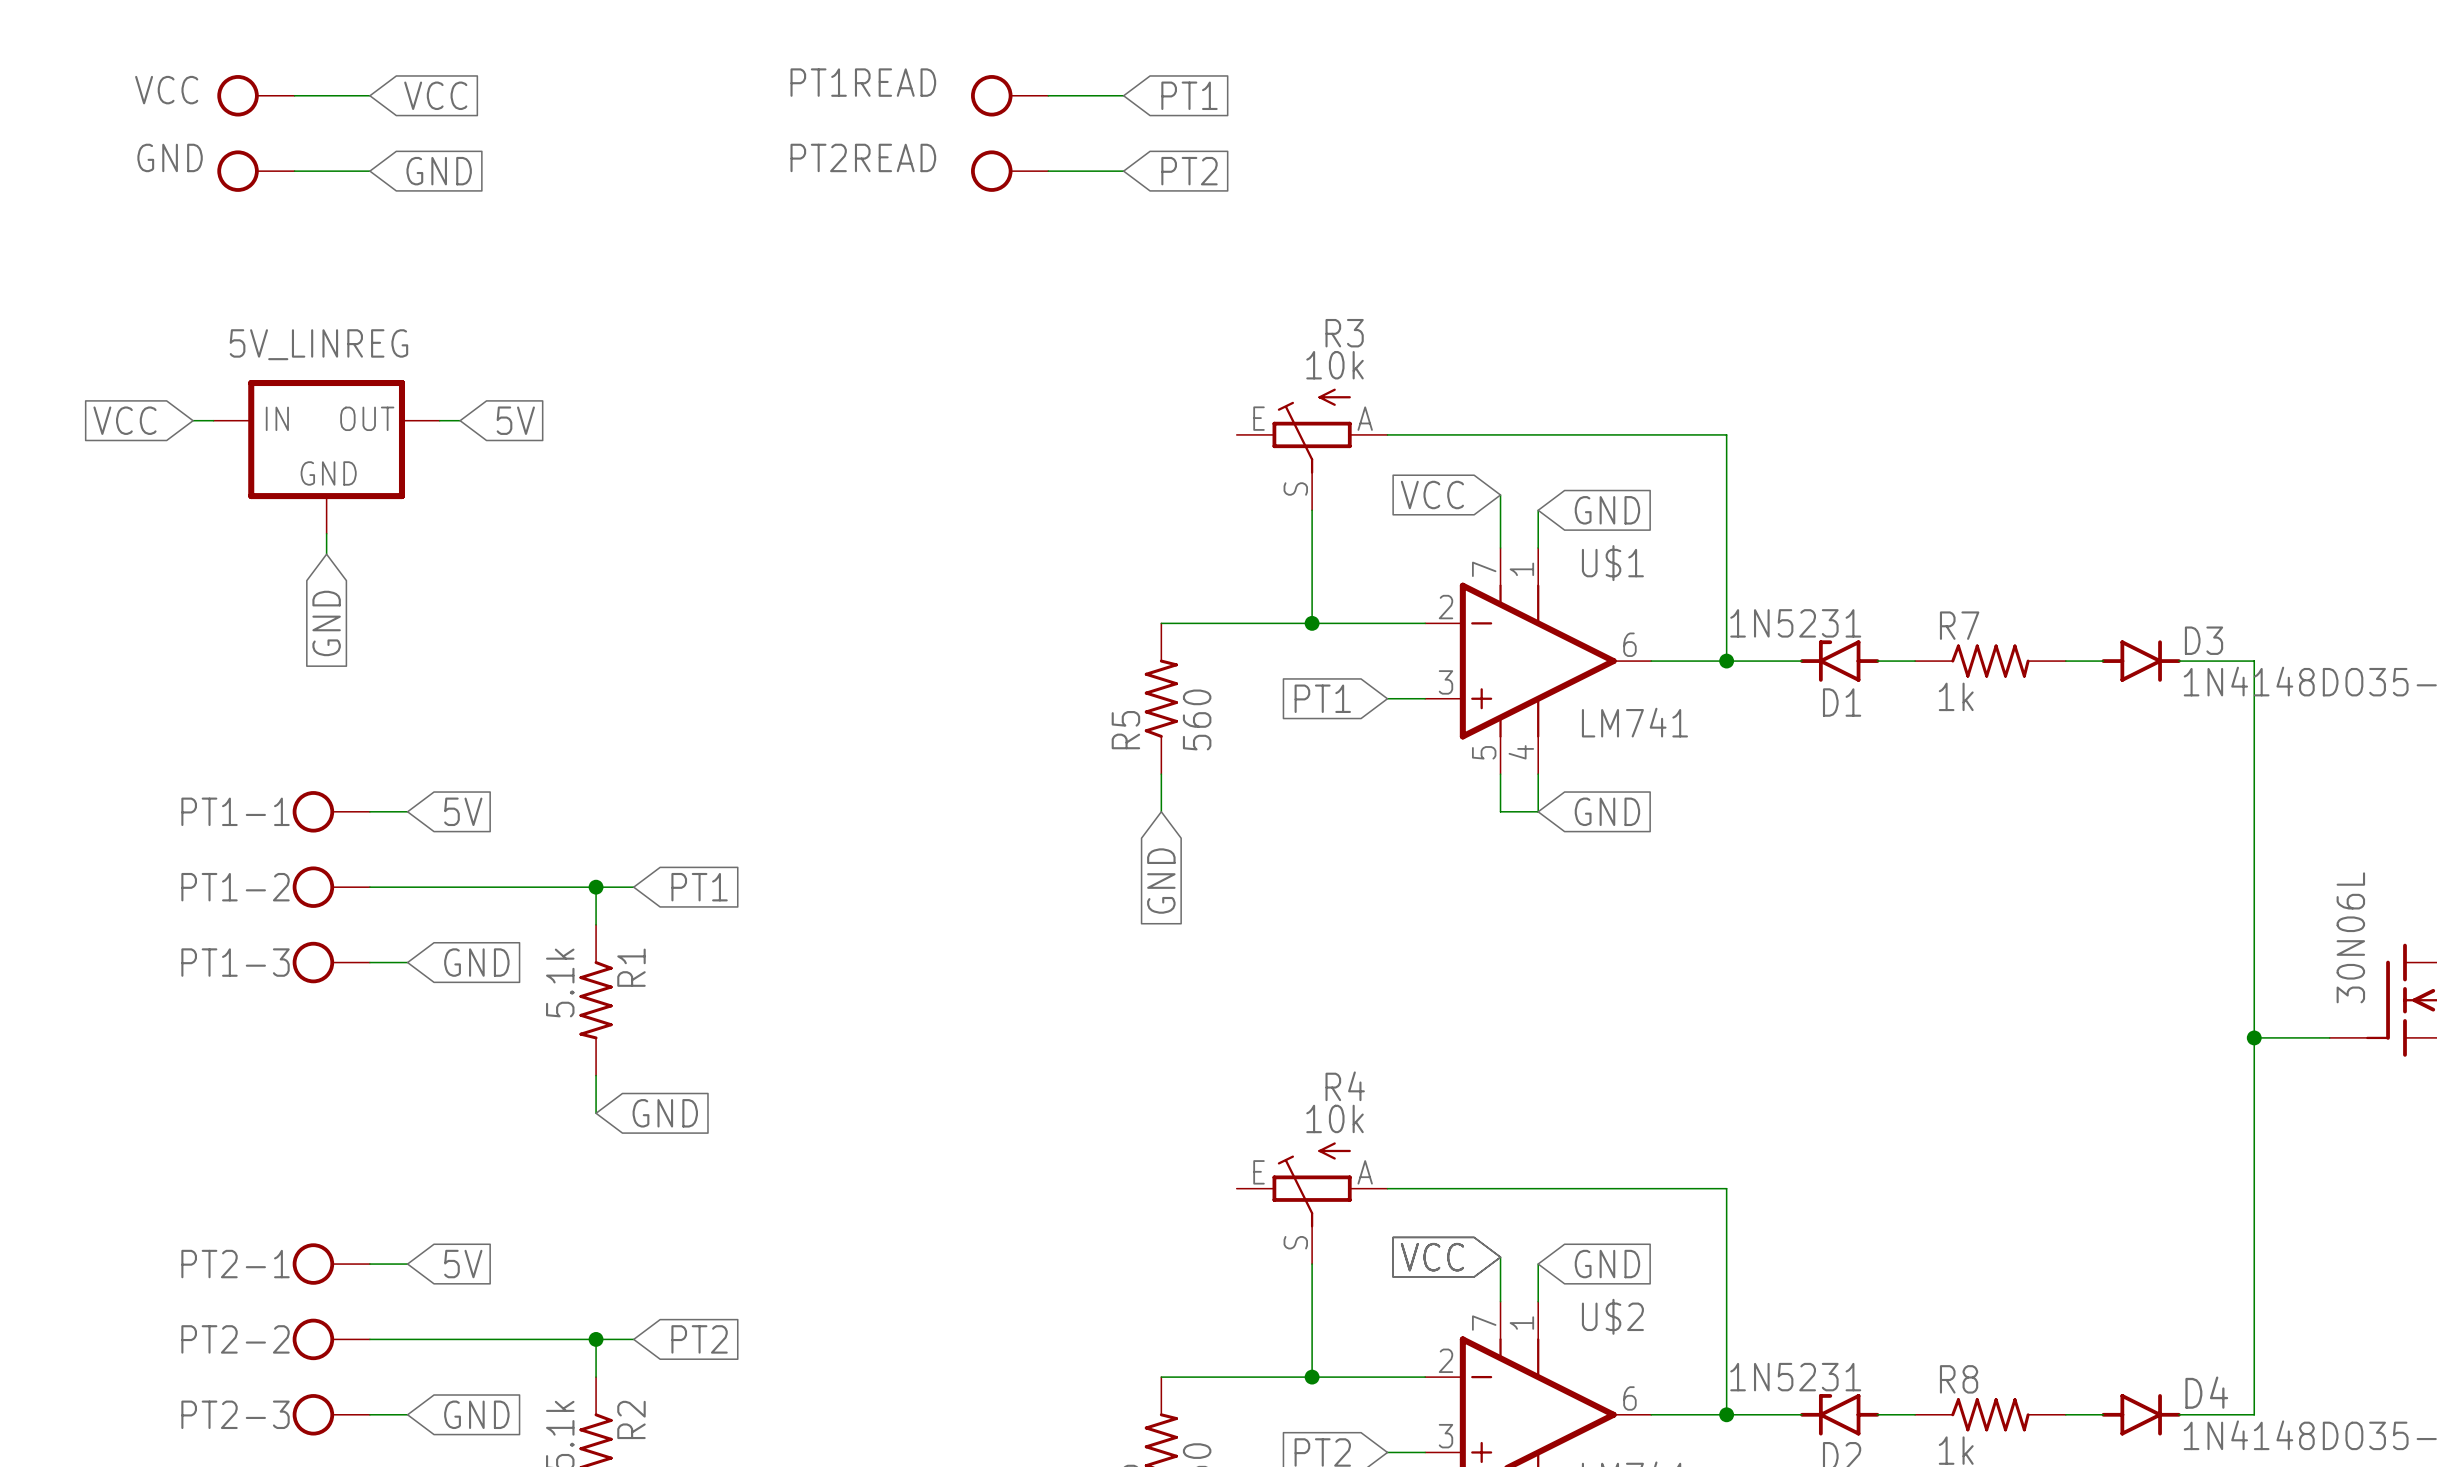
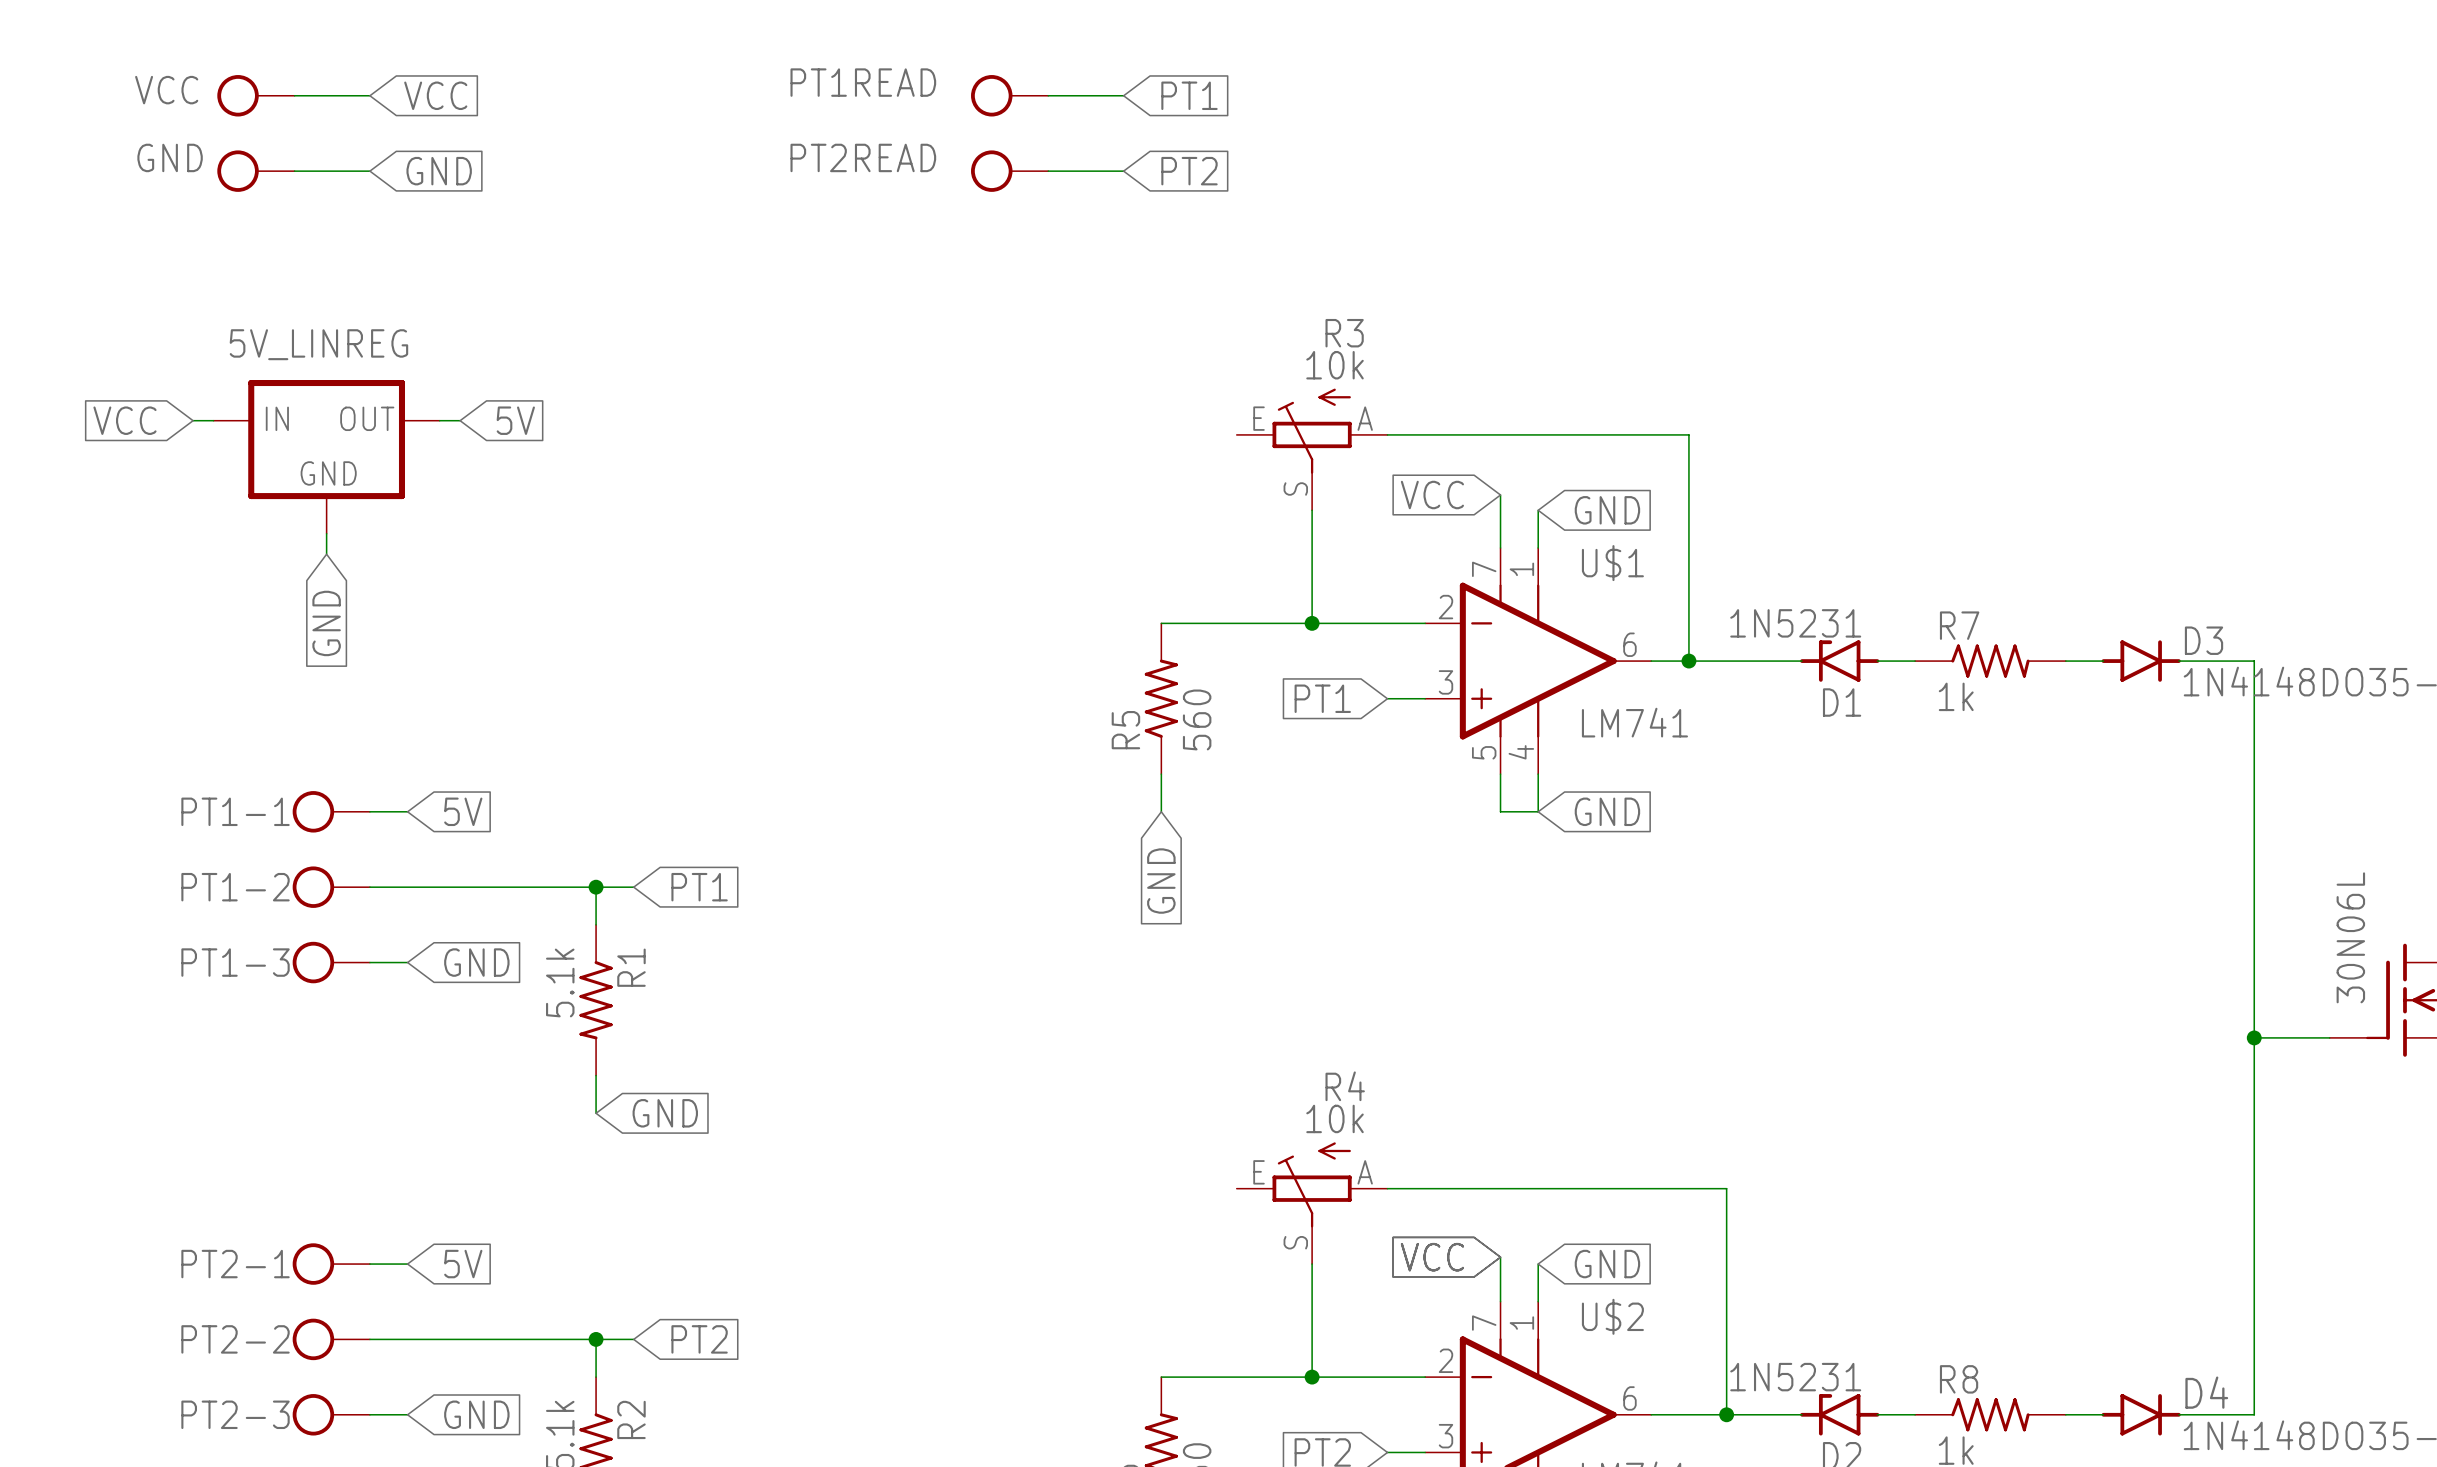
wire: (1688, 434) (1726, 434) (1726, 661) -> (1688, 434) (1688, 661)
junction position: (1726, 661) -> (1688, 661)

